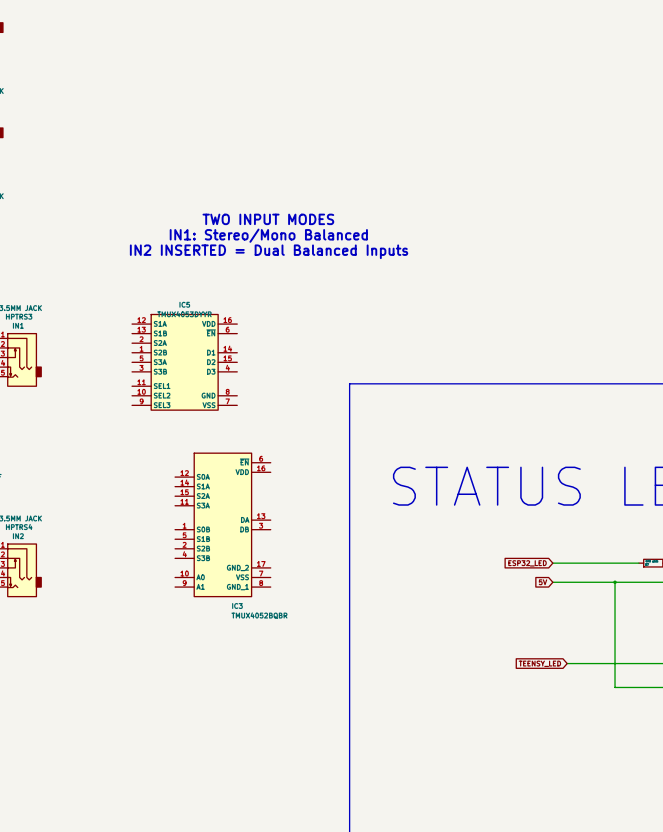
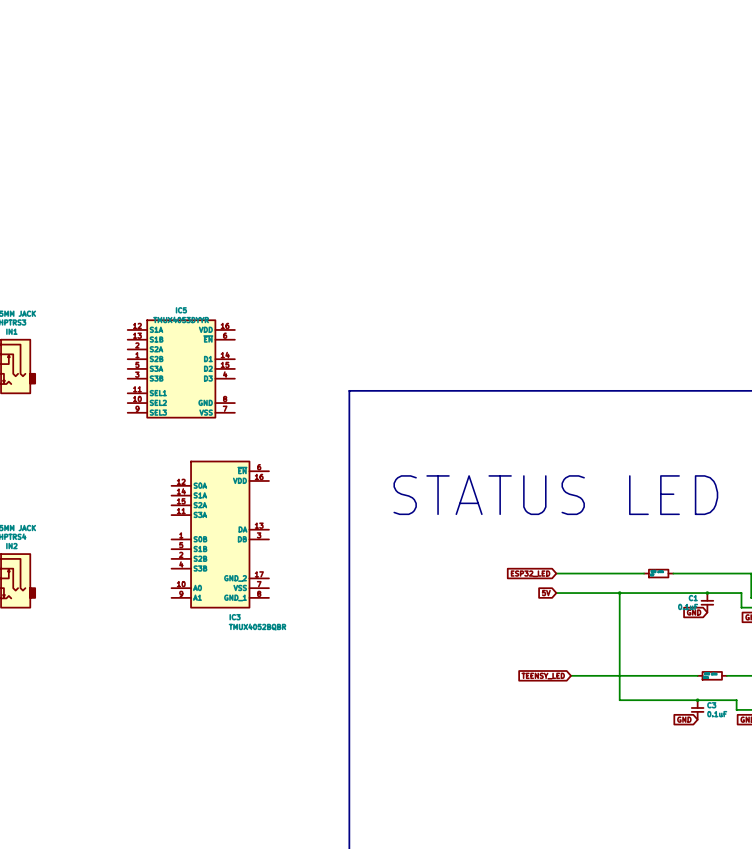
text: TWO INPUT MODES (268, 219) -> none
text: IN1: Stereo/Mono Balanced (268, 235) -> none
text: IN2 INSERTED = Dual Balanced Inputs (269, 251) -> none

